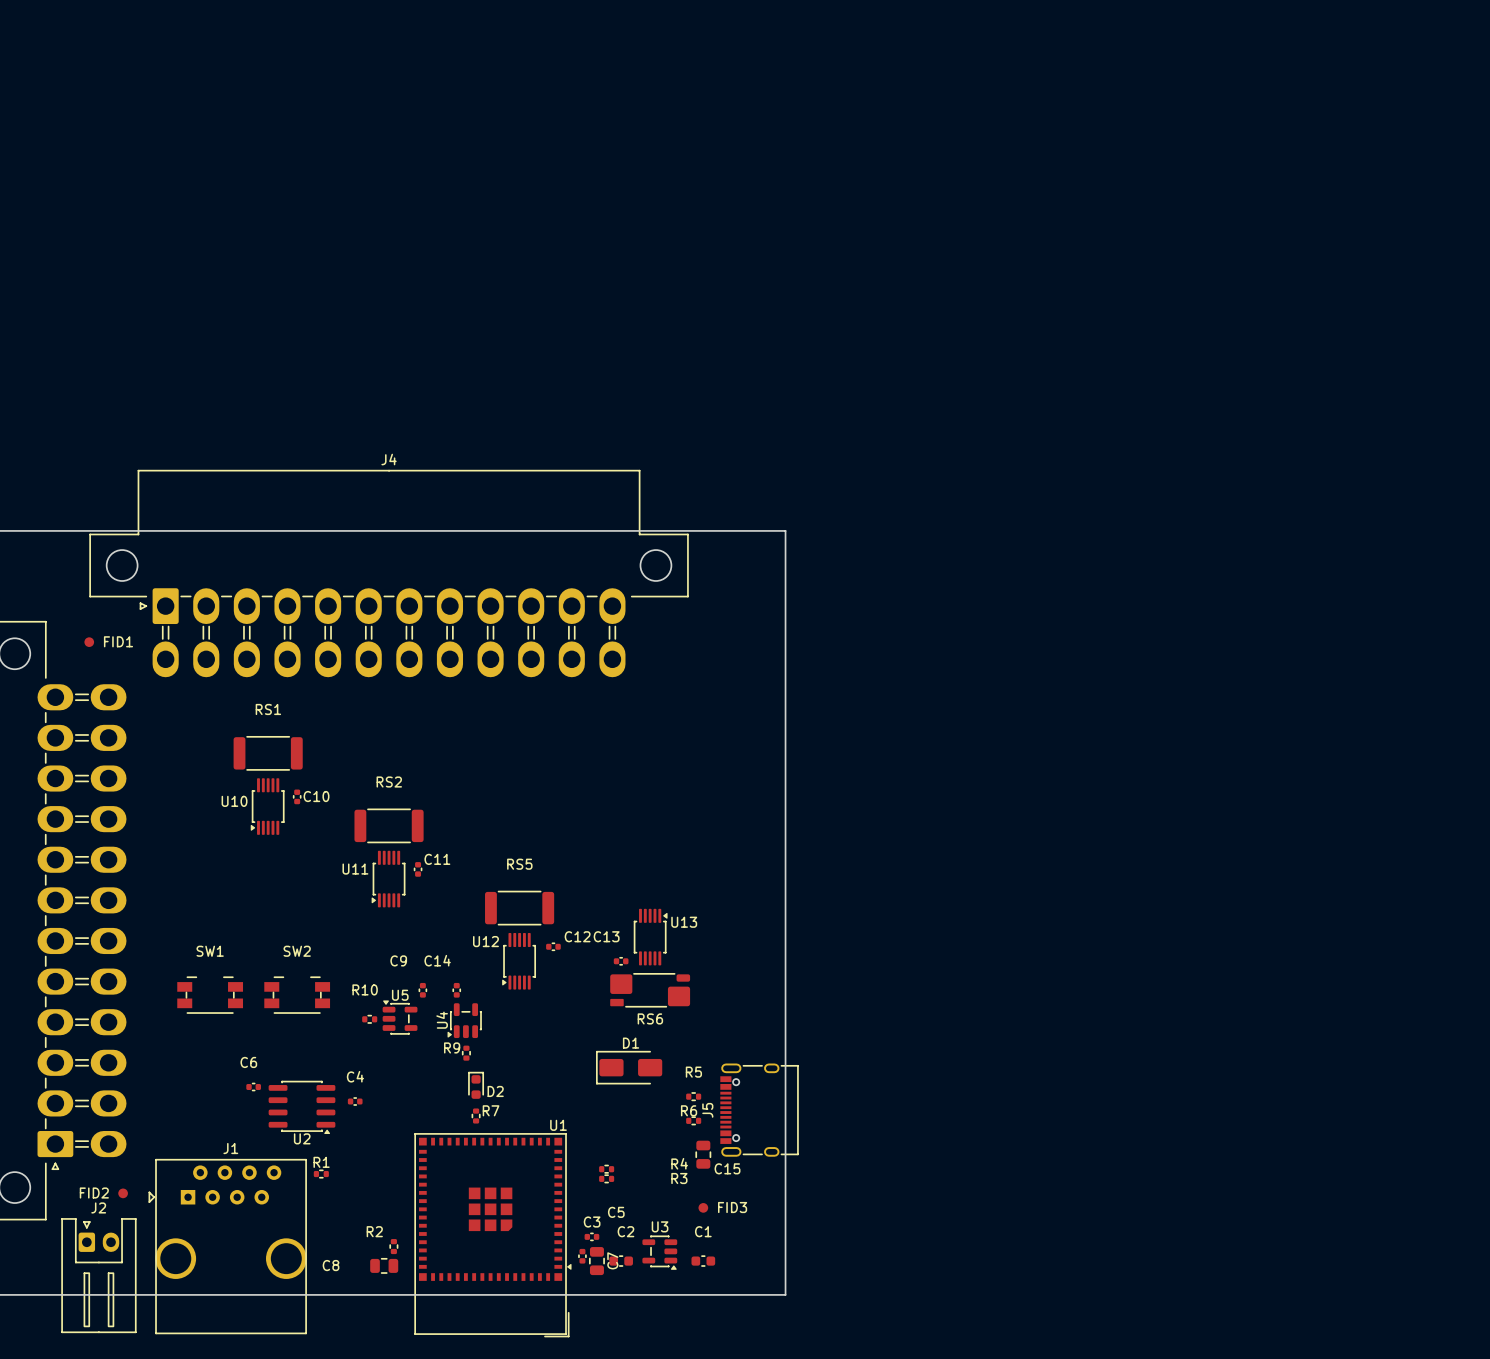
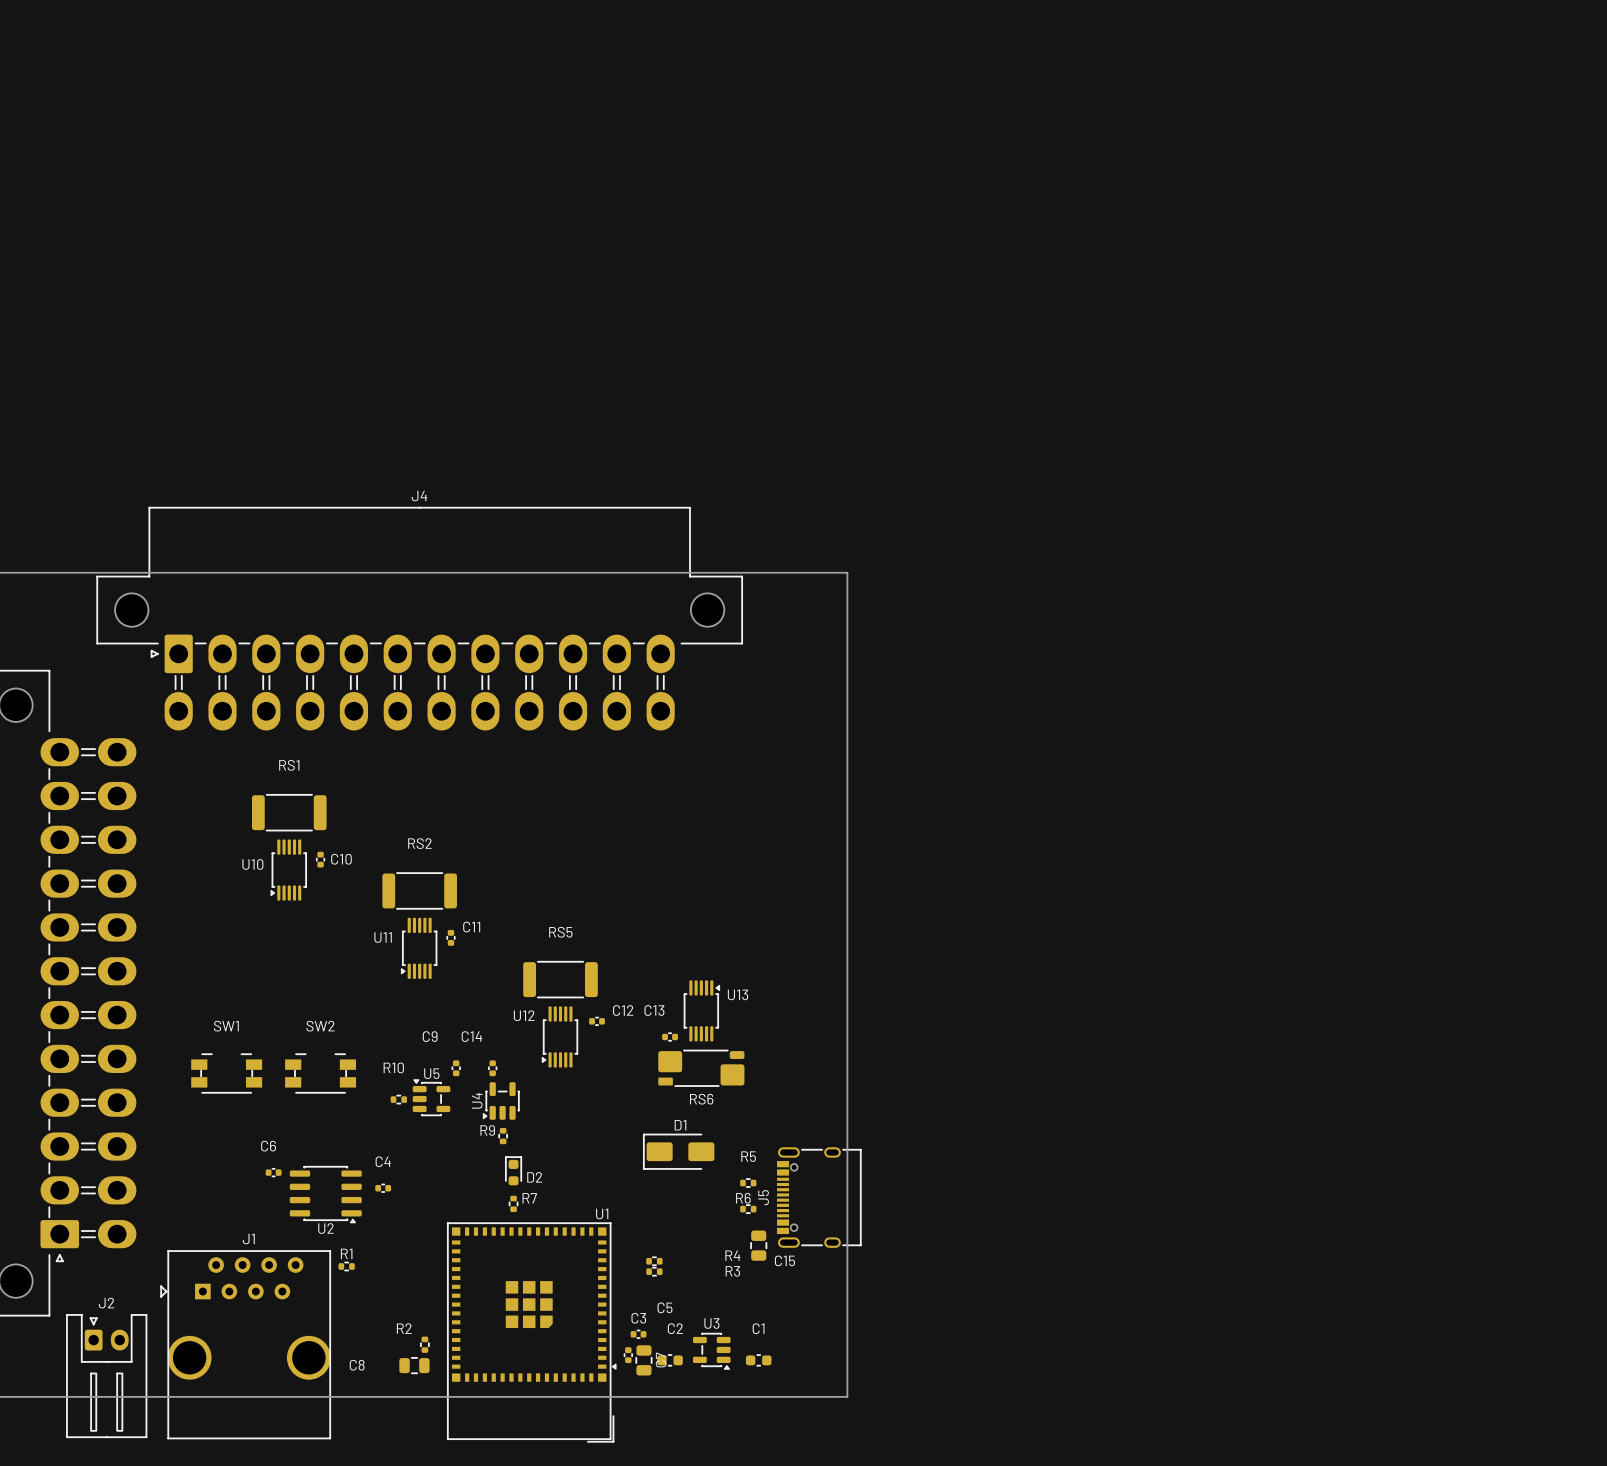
FID1: (89, 642) -> none
FID2: (123, 1193) -> none
FID3: (703, 1207) -> none

